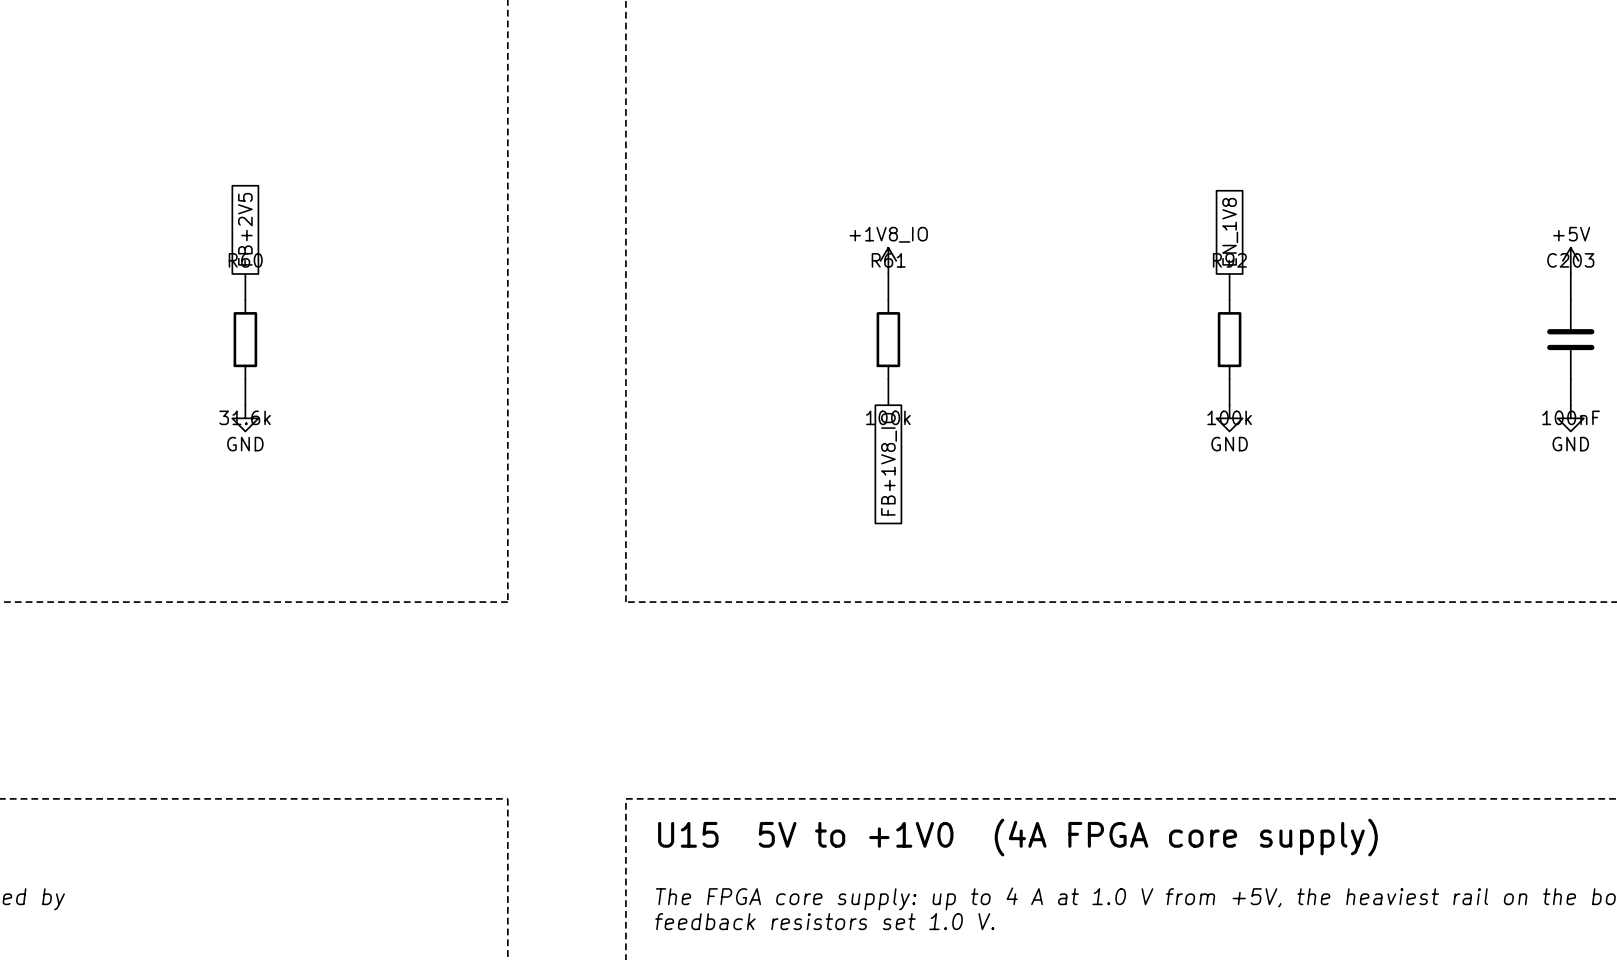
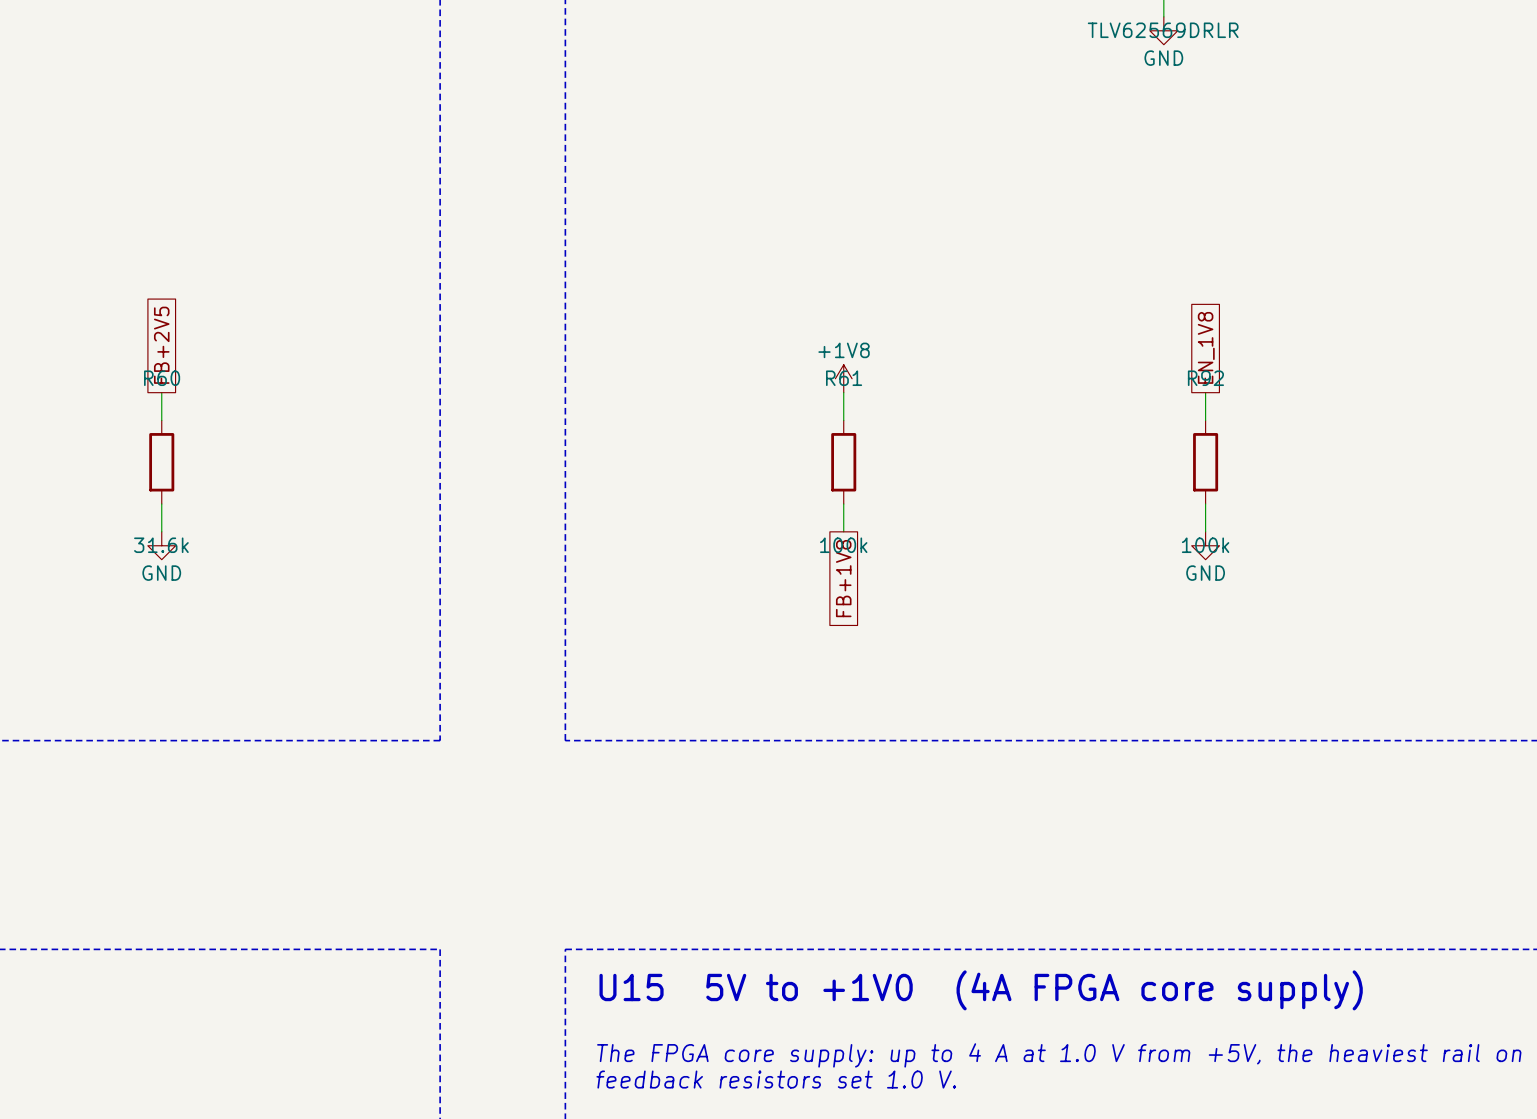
power symbol: +1V8_IO (888, 260) -> +1V8 (843, 378)
global label: FB+1V8_IO (889, 464) -> FB+1V8 (843, 578)

